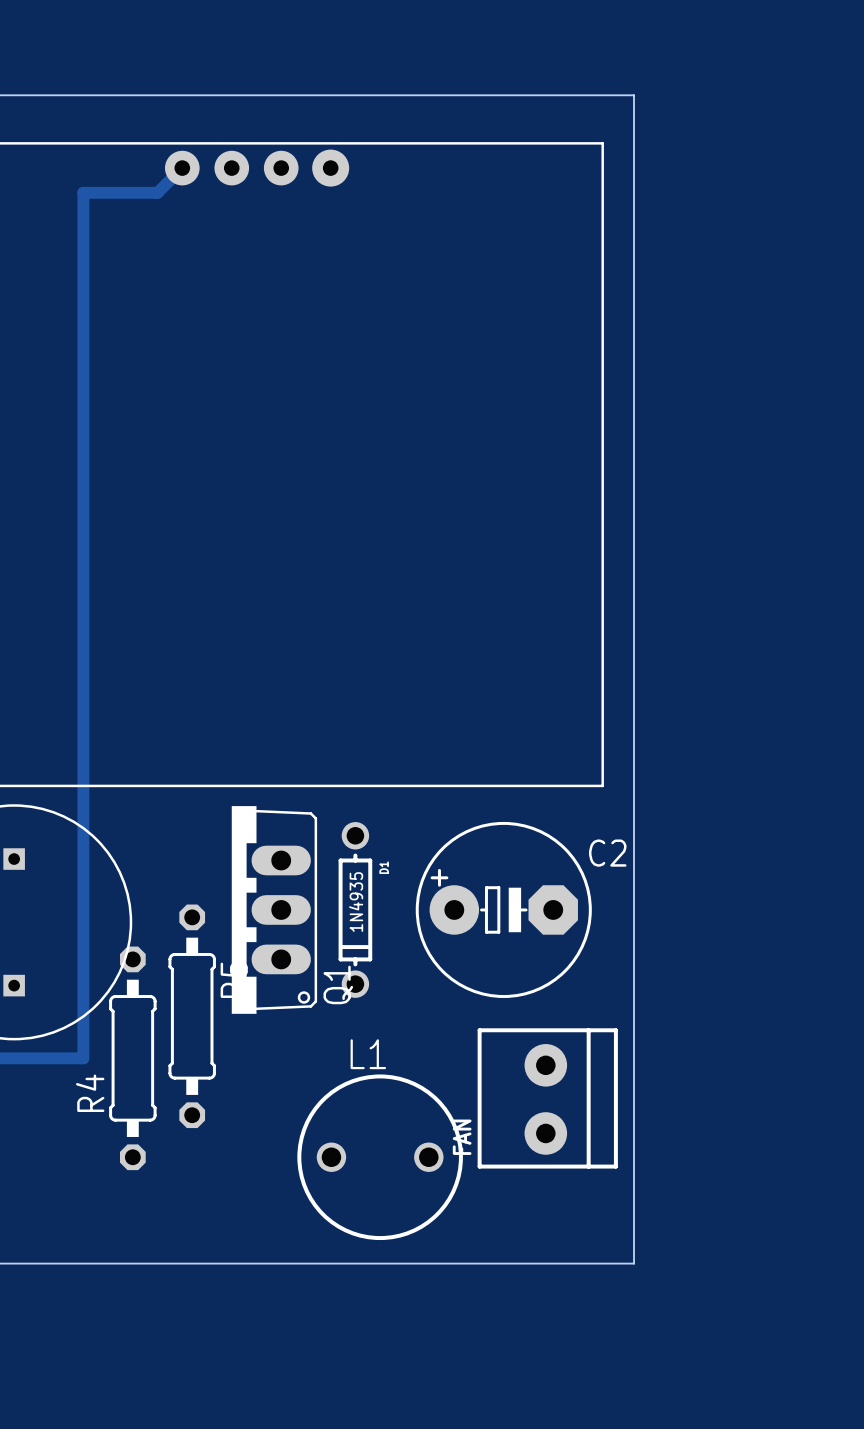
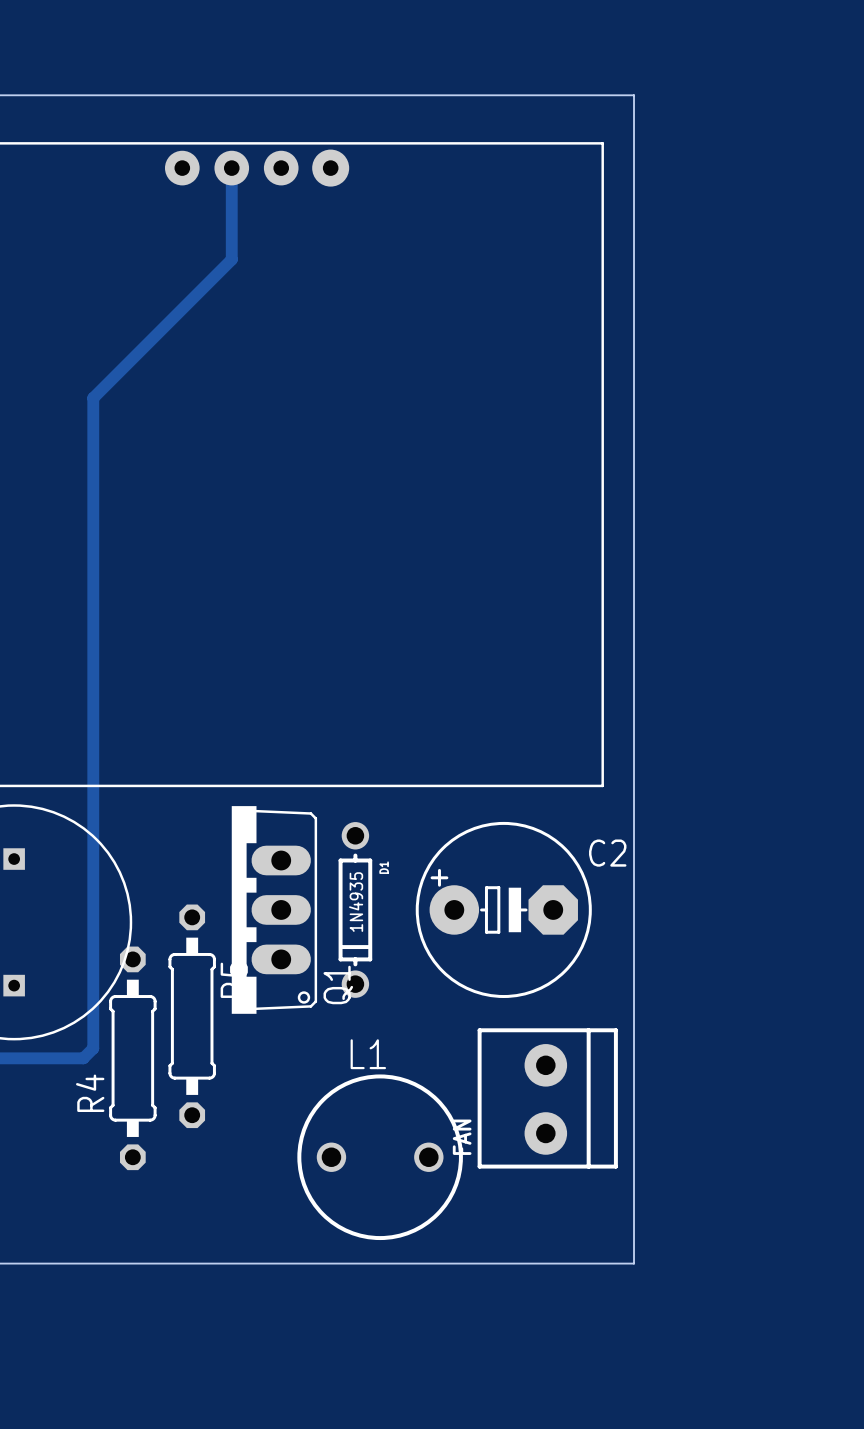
track: (182, 168) (157, 192) (83, 192) (83, 1058) -> (231, 168) (231, 259) (93, 398) (93, 1048) (83, 1058)

